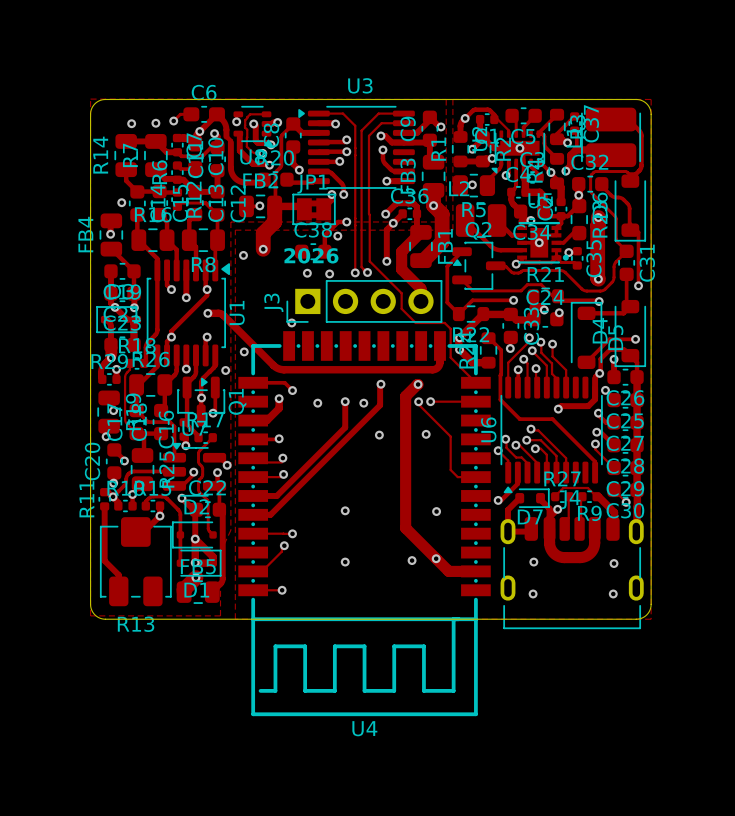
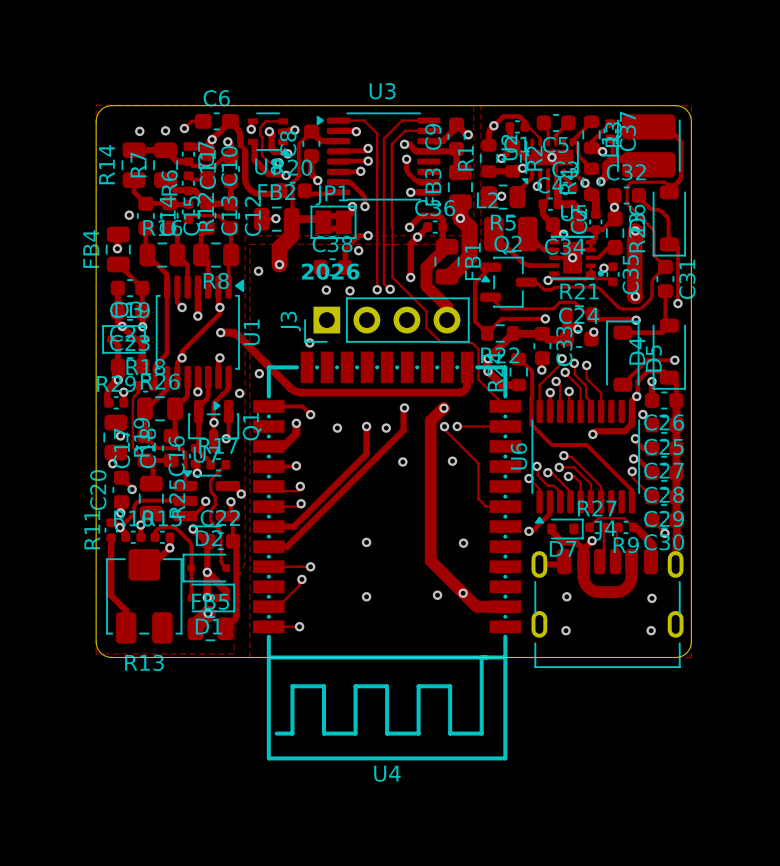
track: (519, 498) (507, 509) (507, 531) -> none
track: (541, 498) (549, 508) (549, 517) -> (550, 529) (563, 542) (576, 542) (583, 549)

